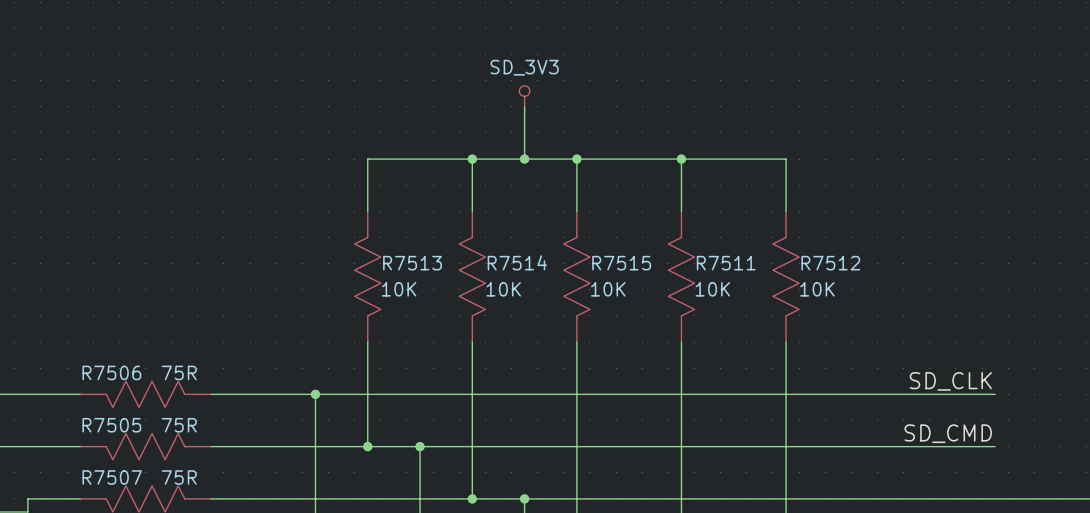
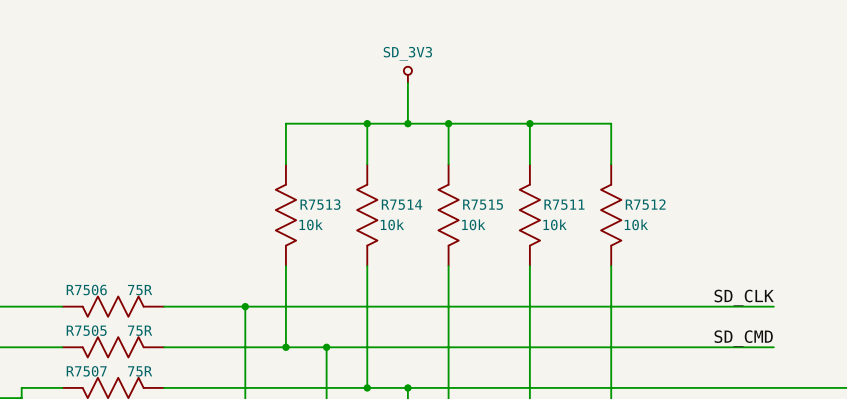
R7513 value: 10K (399, 289) -> 10k (311, 224)
R7514 value: 10K (503, 289) -> 10k (392, 224)
R7515 value: 10K (608, 289) -> 10k (473, 224)
R7511 value: 10K (712, 289) -> 10k (555, 224)
R7512 value: 10K (817, 289) -> 10k (636, 224)

